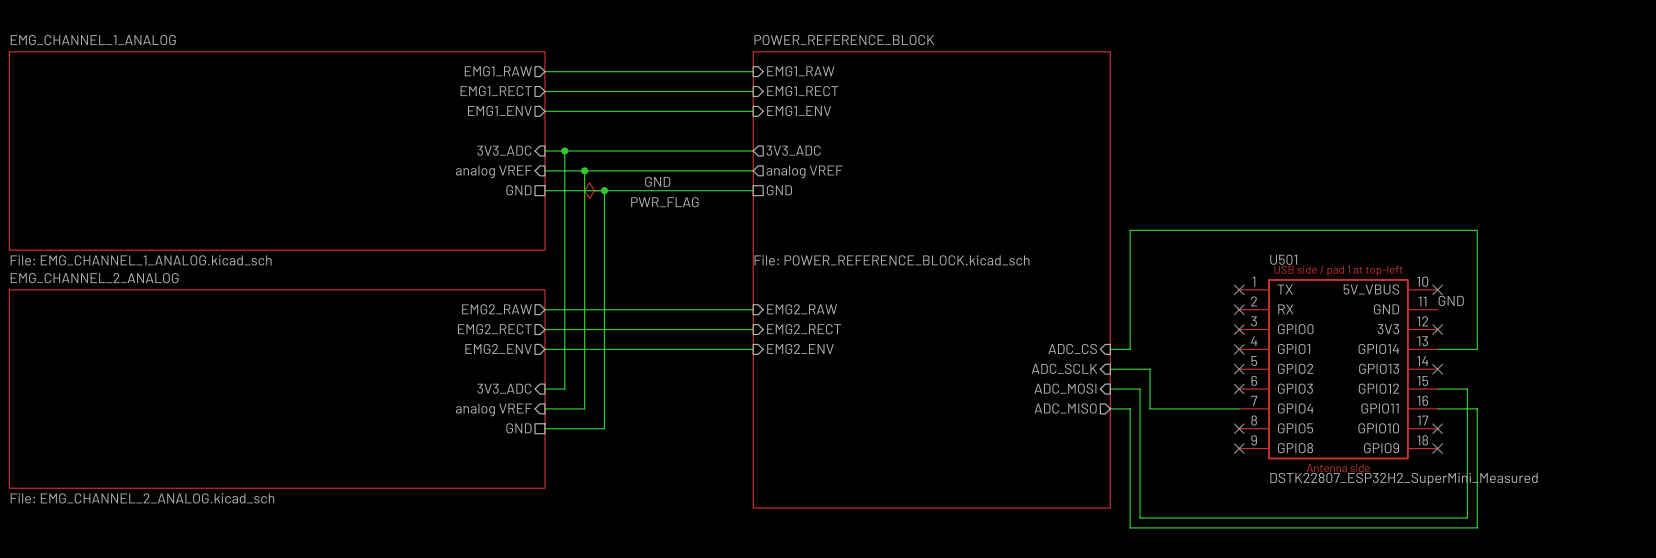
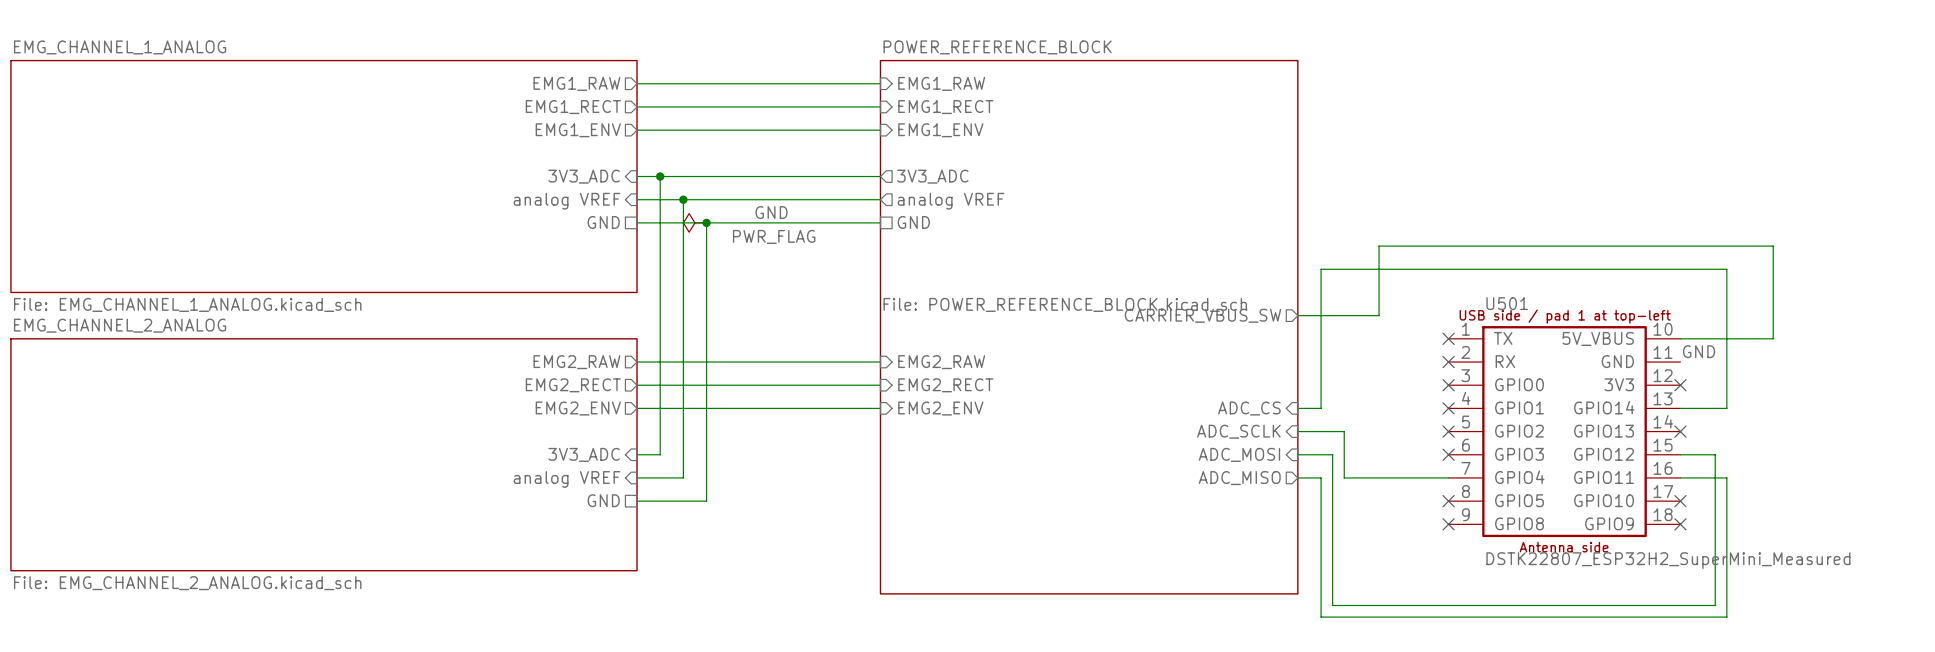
sheet pin: none -> CARRIER_VBUS_SW (1203, 315)
wire: none -> (1297, 315) (1379, 315) (1379, 246) (1773, 246) (1773, 338) (1680, 338)
no-connect mark: (1437, 289) -> none

